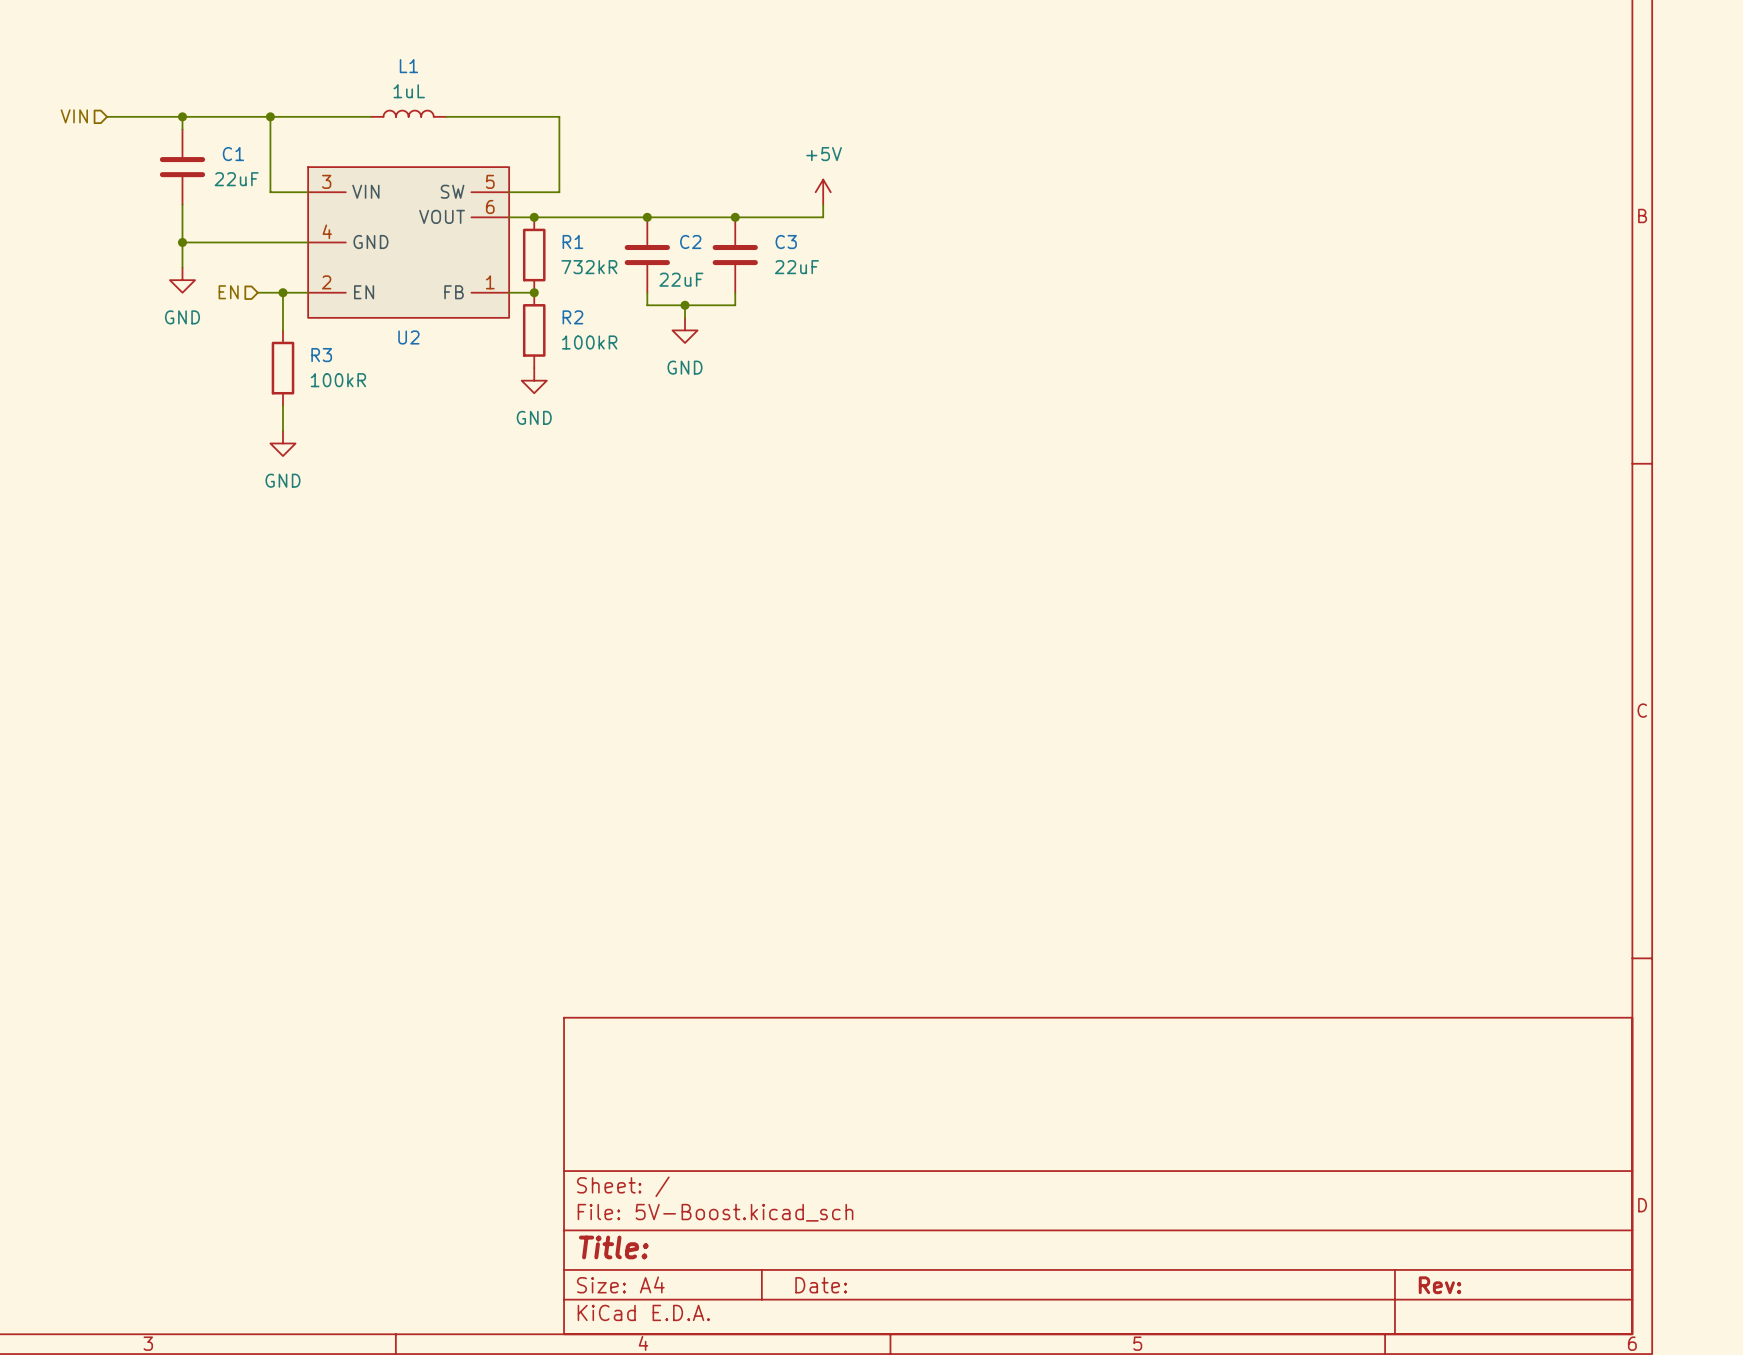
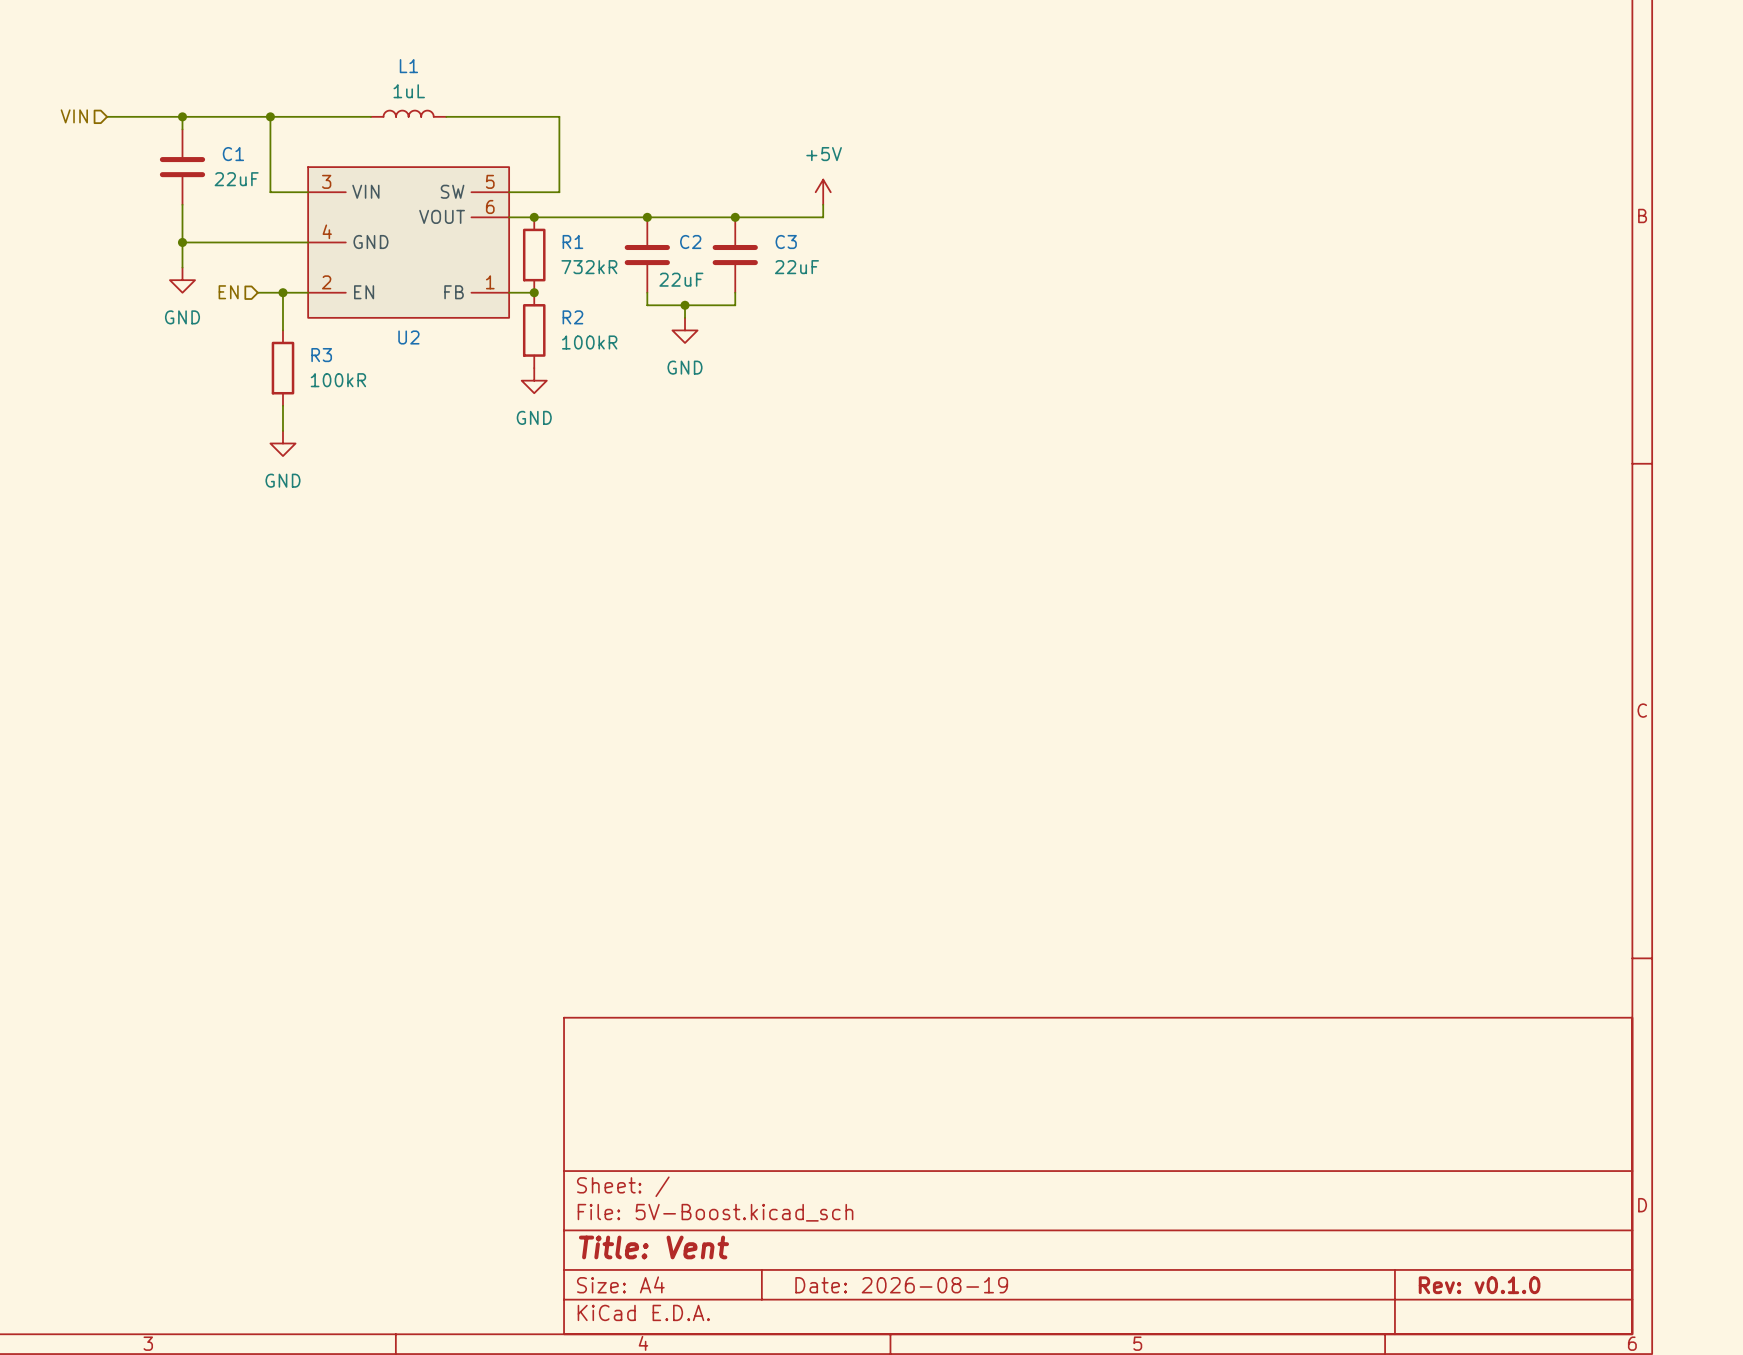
title block: Title: (613, 1247) -> Title: Vent (653, 1247)
title block: Date: (821, 1285) -> Date: 2026-08-19 (901, 1285)
title block: Rev: (1440, 1285) -> Rev: v0.1.0 (1479, 1285)

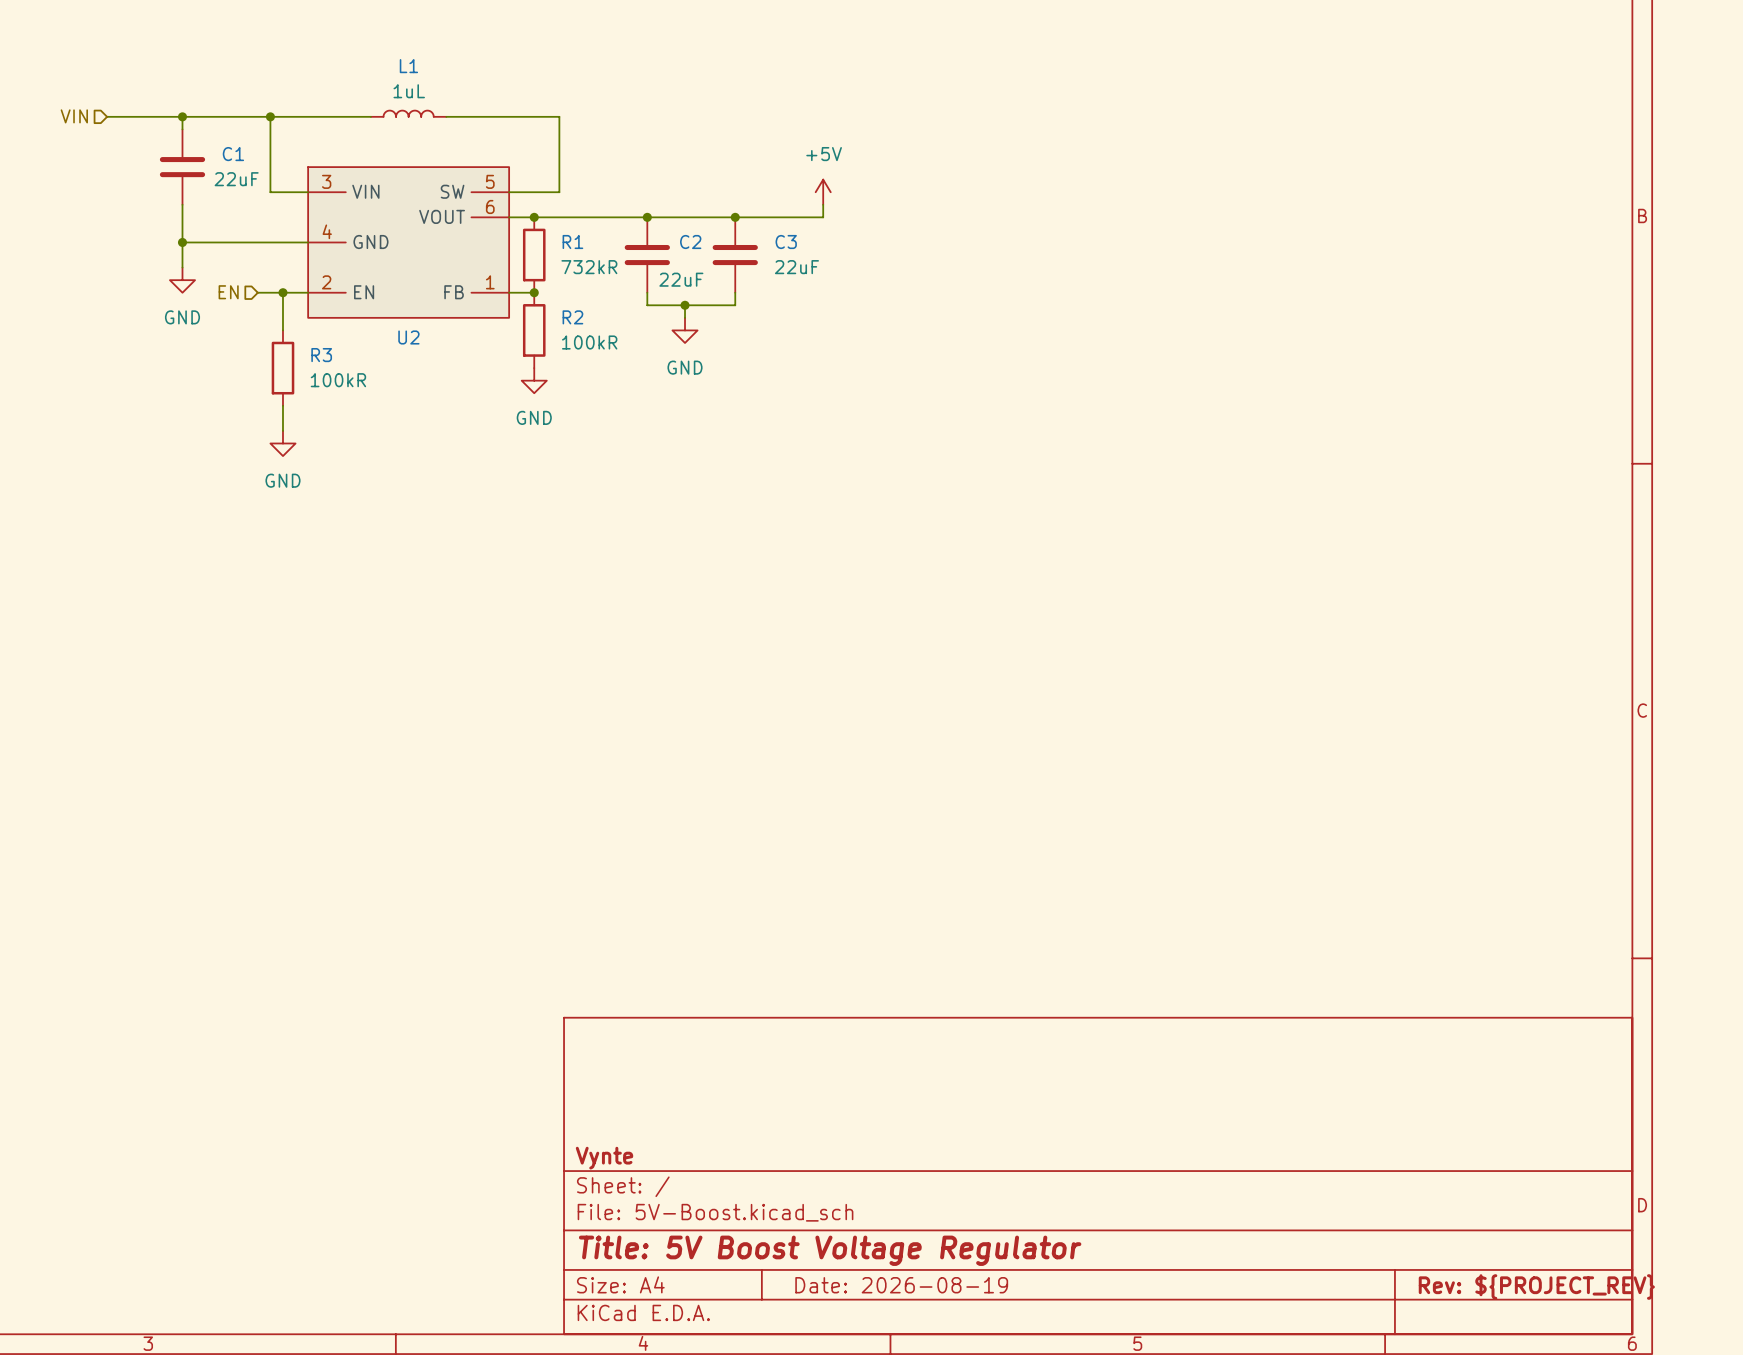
title block: none -> Vynte (604, 1158)
title block: Title: Vent (653, 1247) -> Title: 5V Boost Voltage Regulator (830, 1250)
title block: Rev: v0.1.0 (1479, 1285) -> Rev: ${PROJECT_REV} (1536, 1287)

